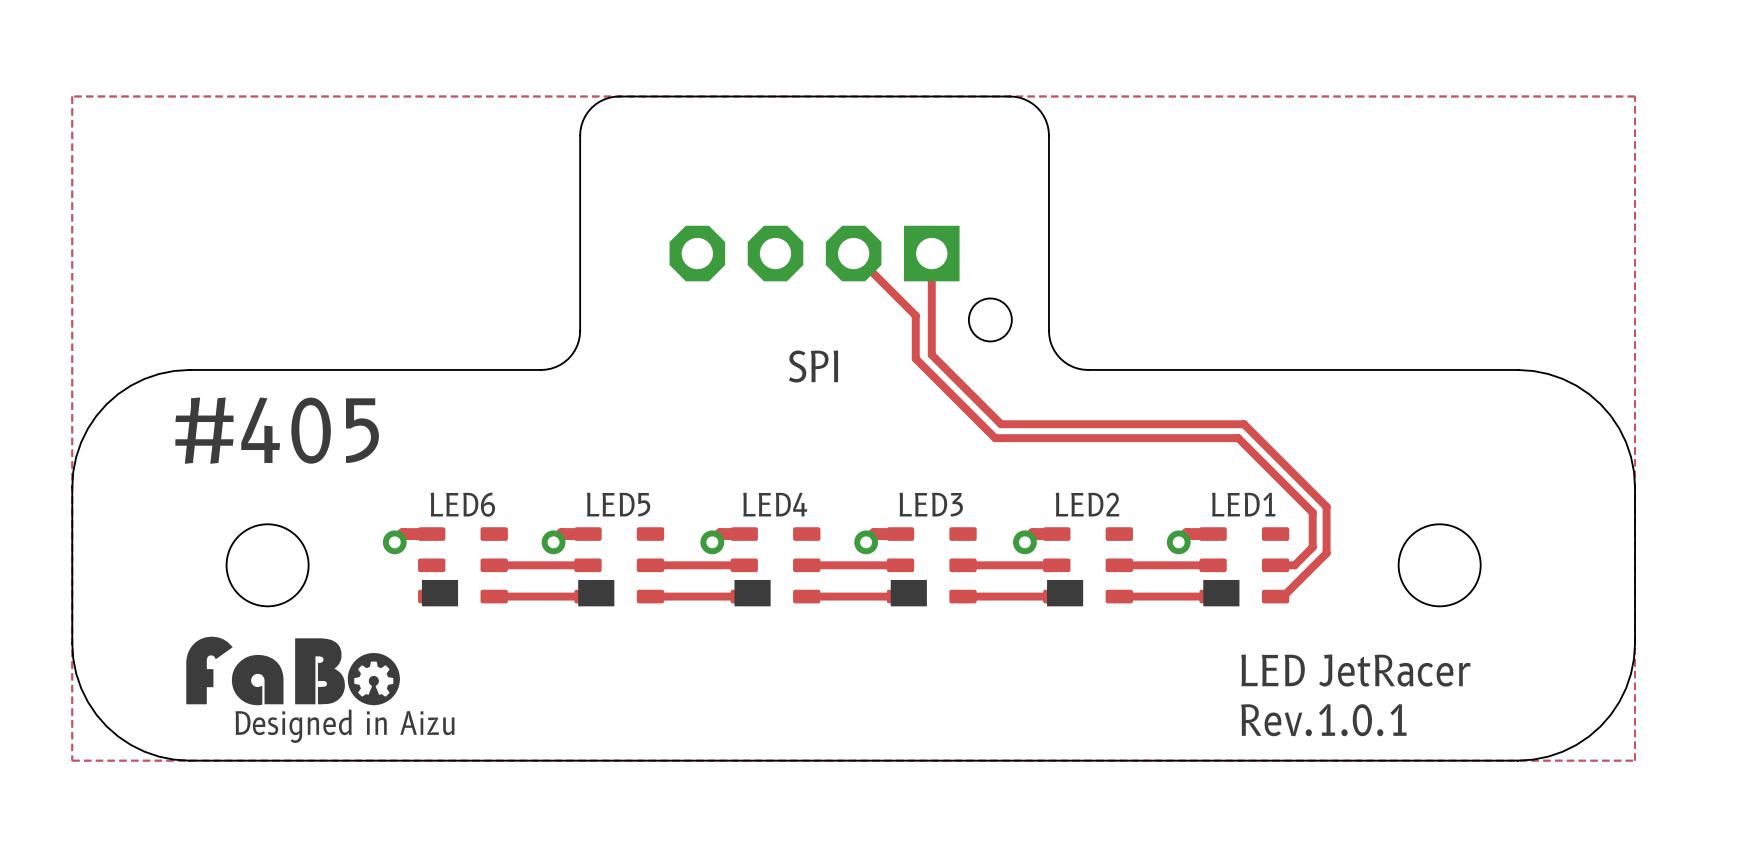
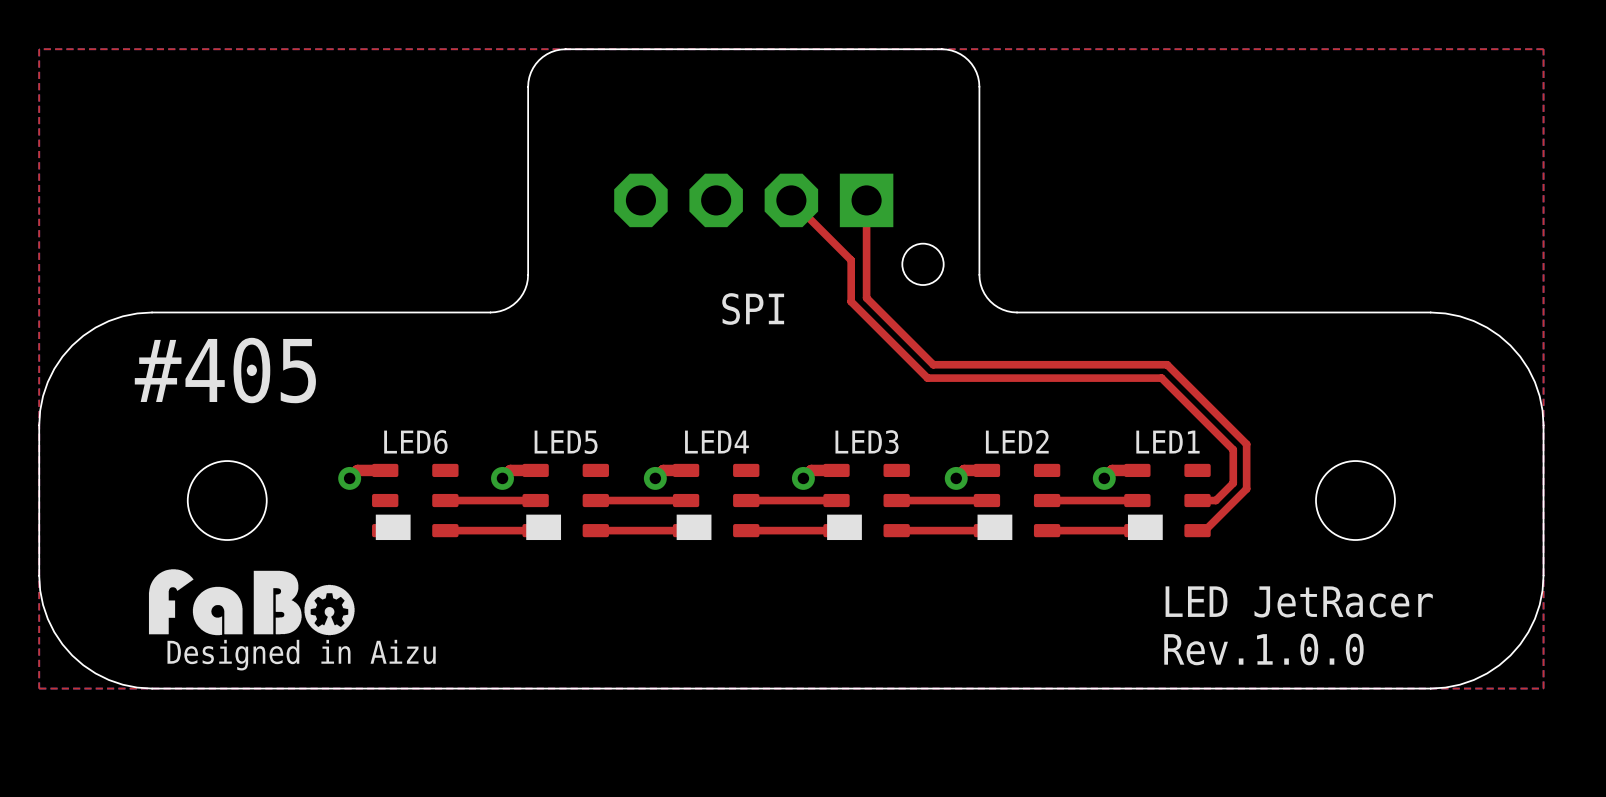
text: Rev.1.0.1 (1323, 720) -> Rev.1.0.0 (1263, 649)

